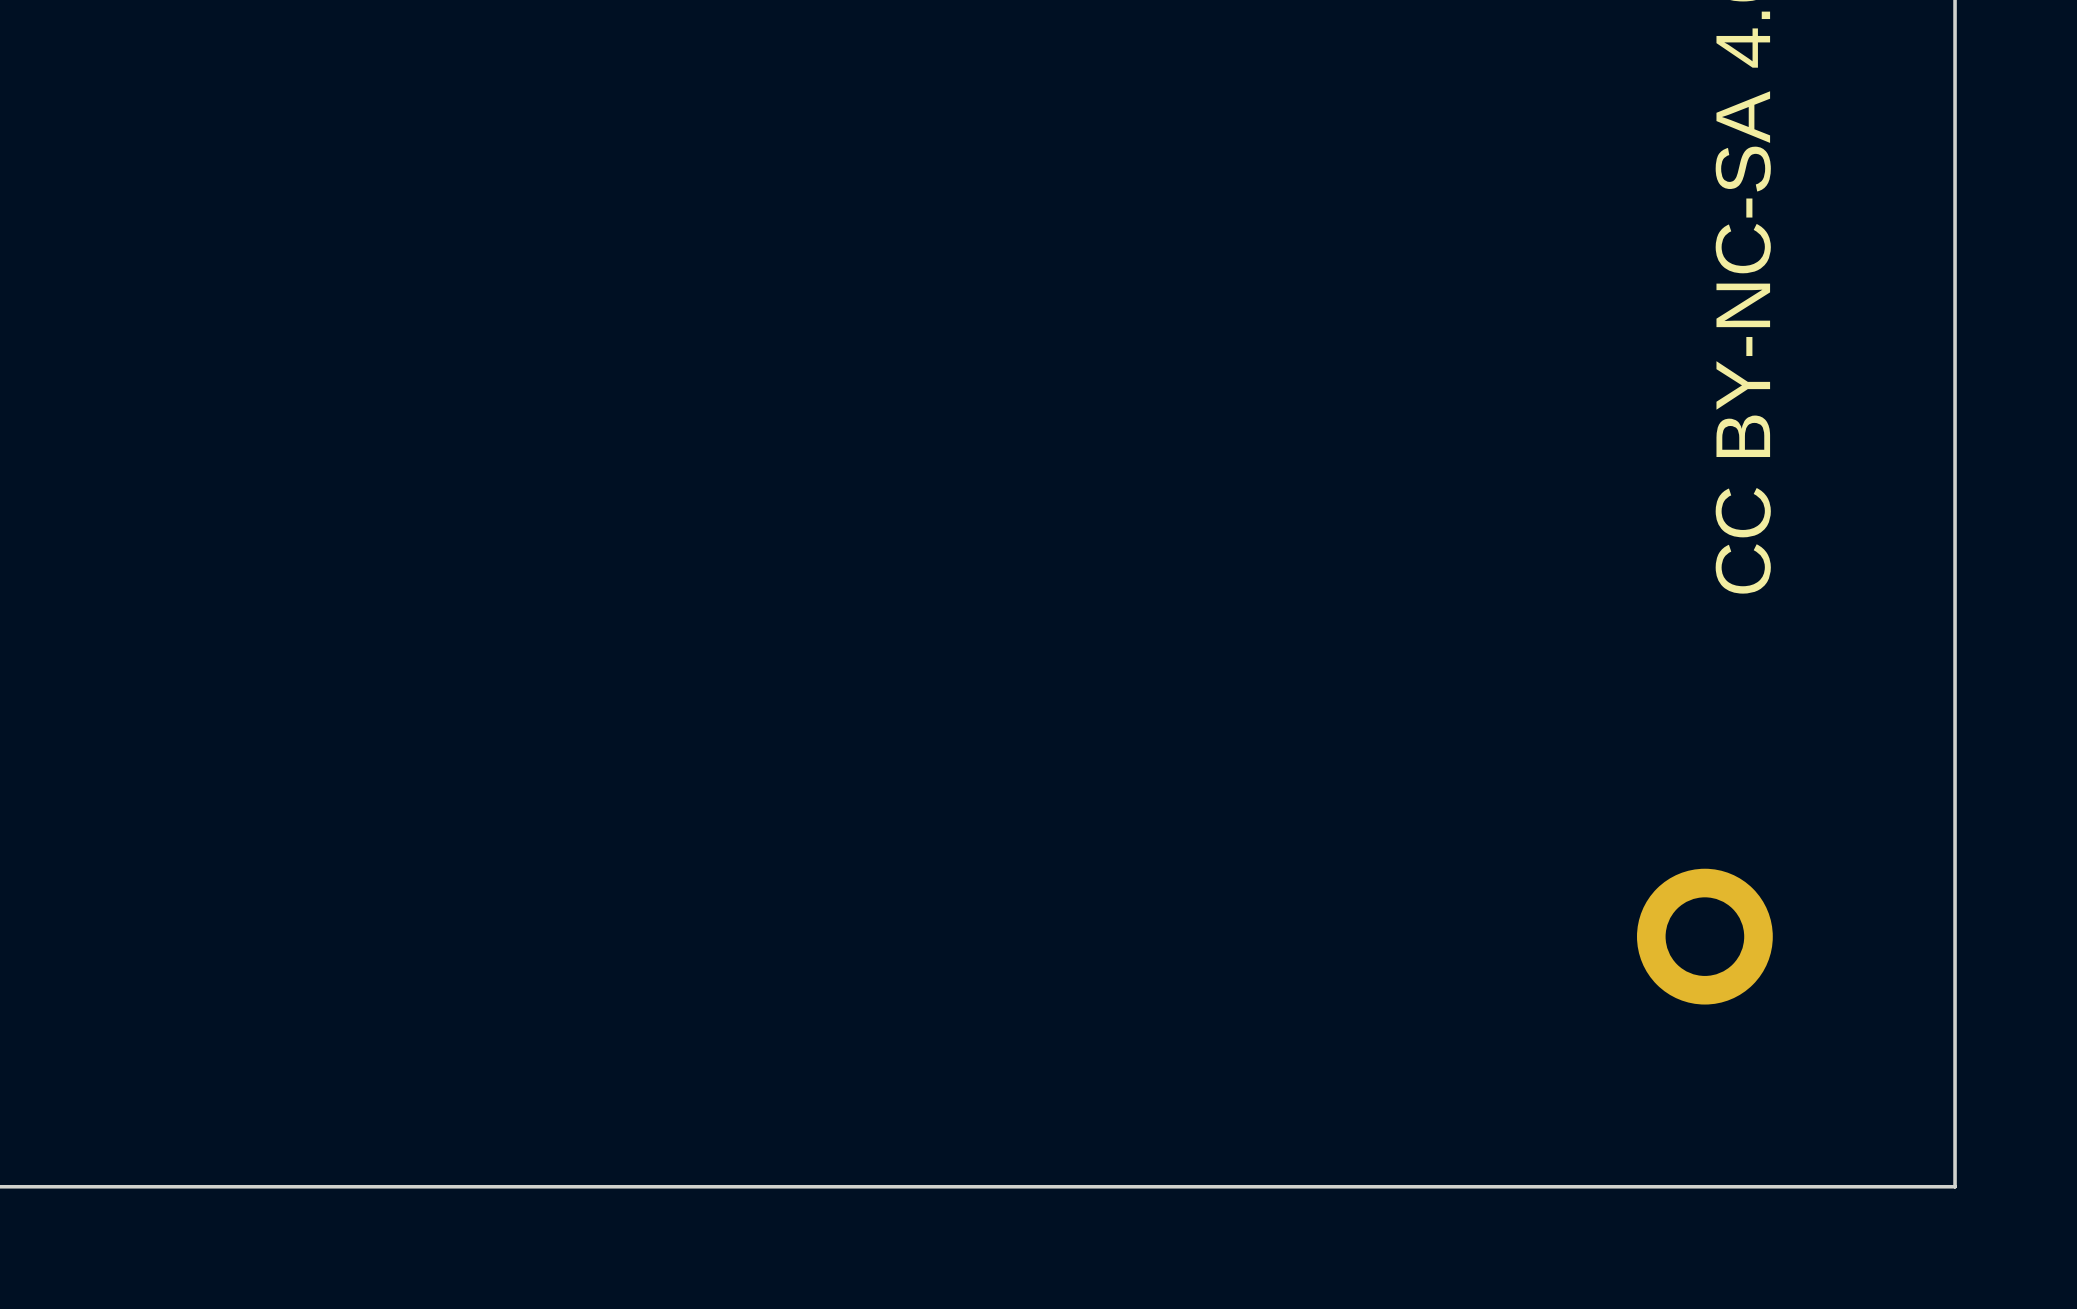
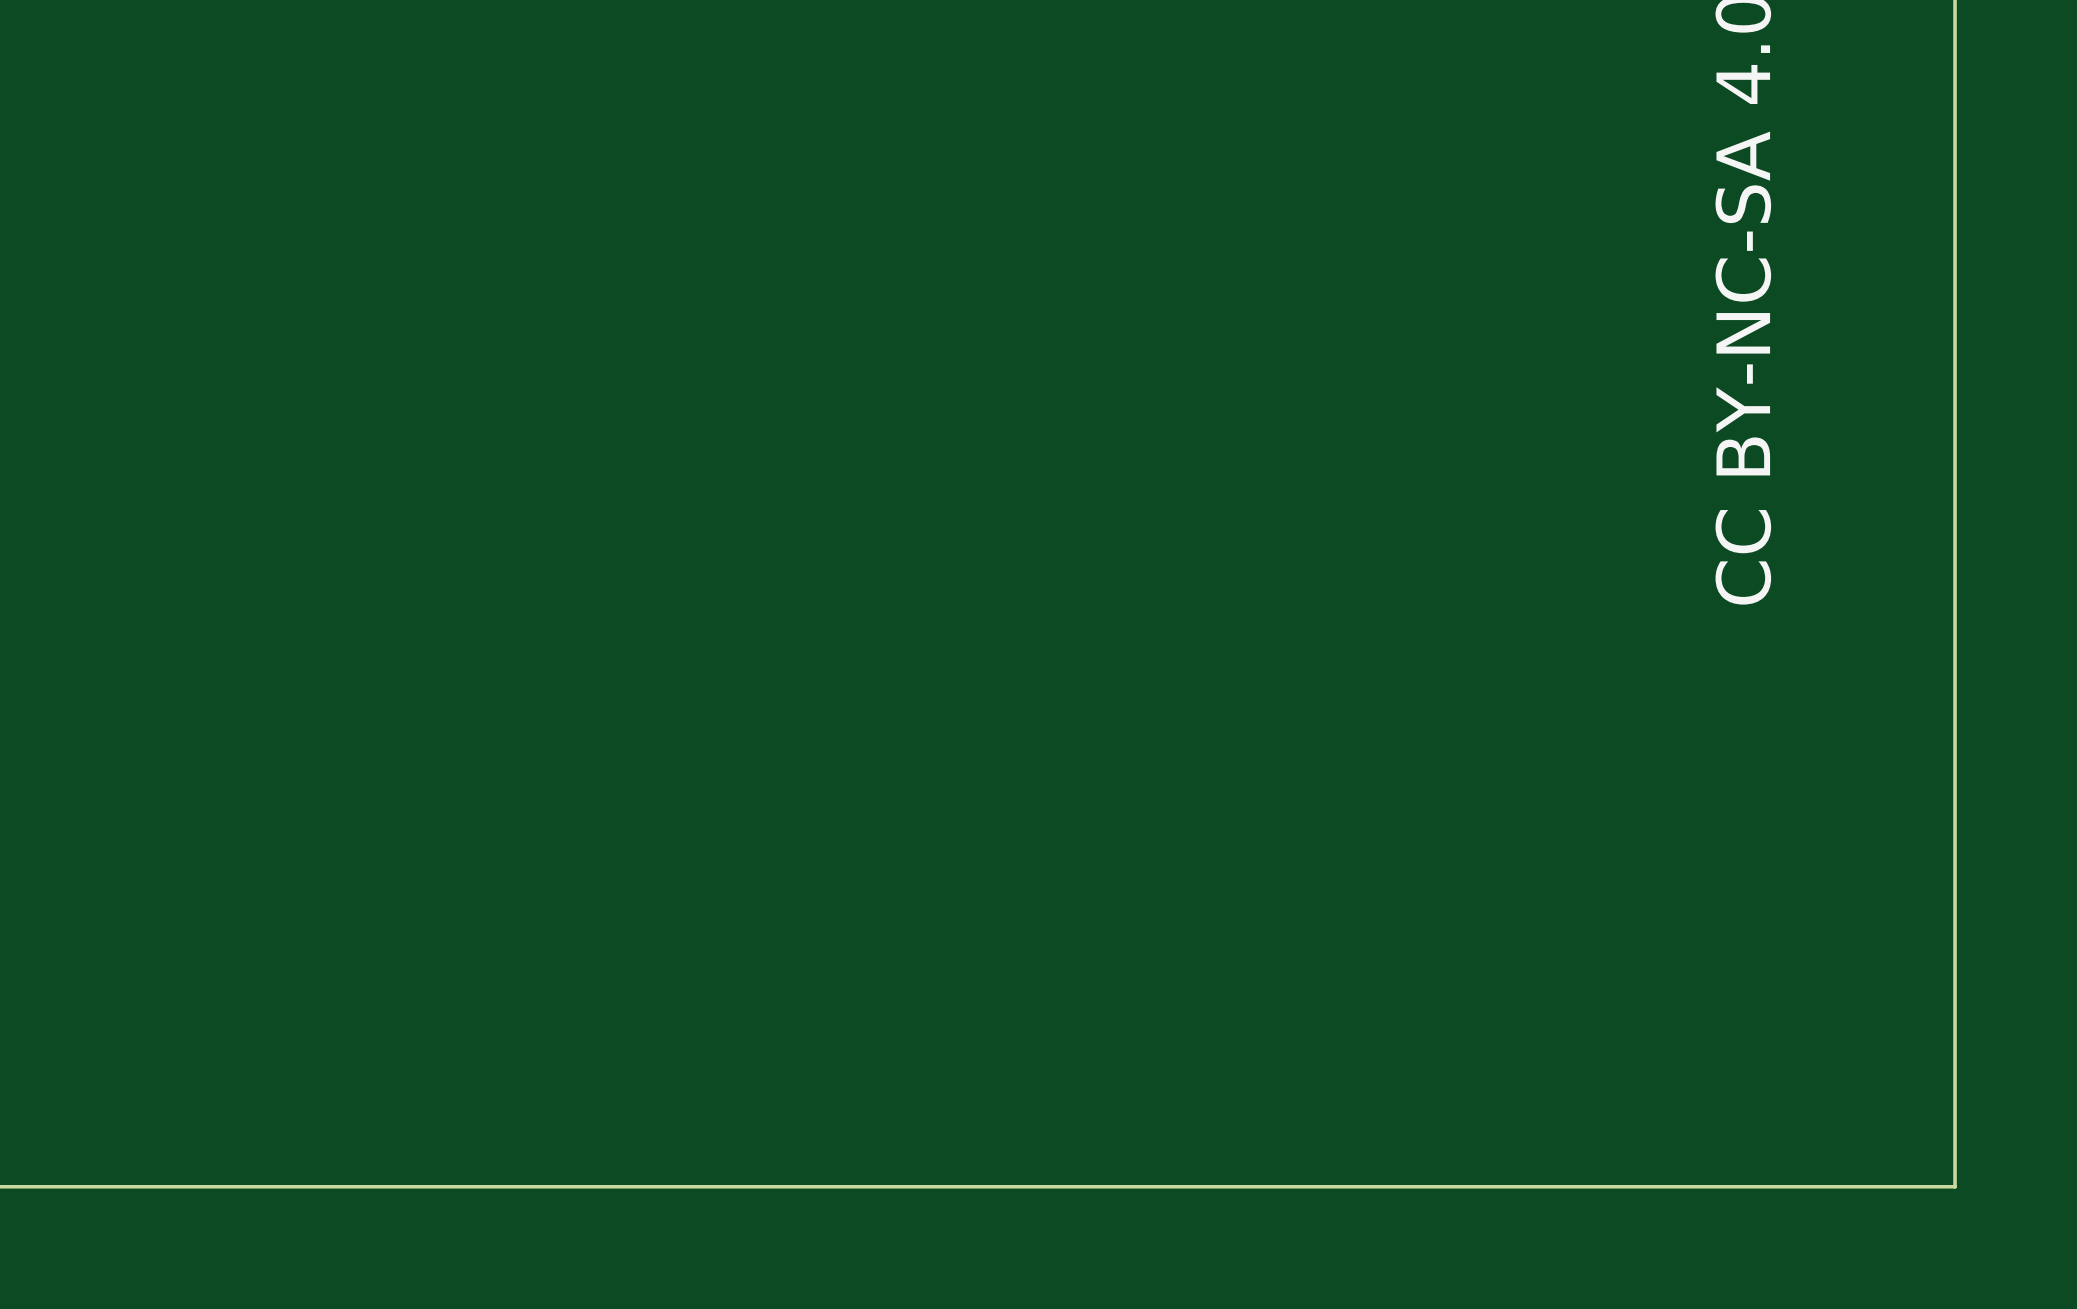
part: (1704, 936) -> none

